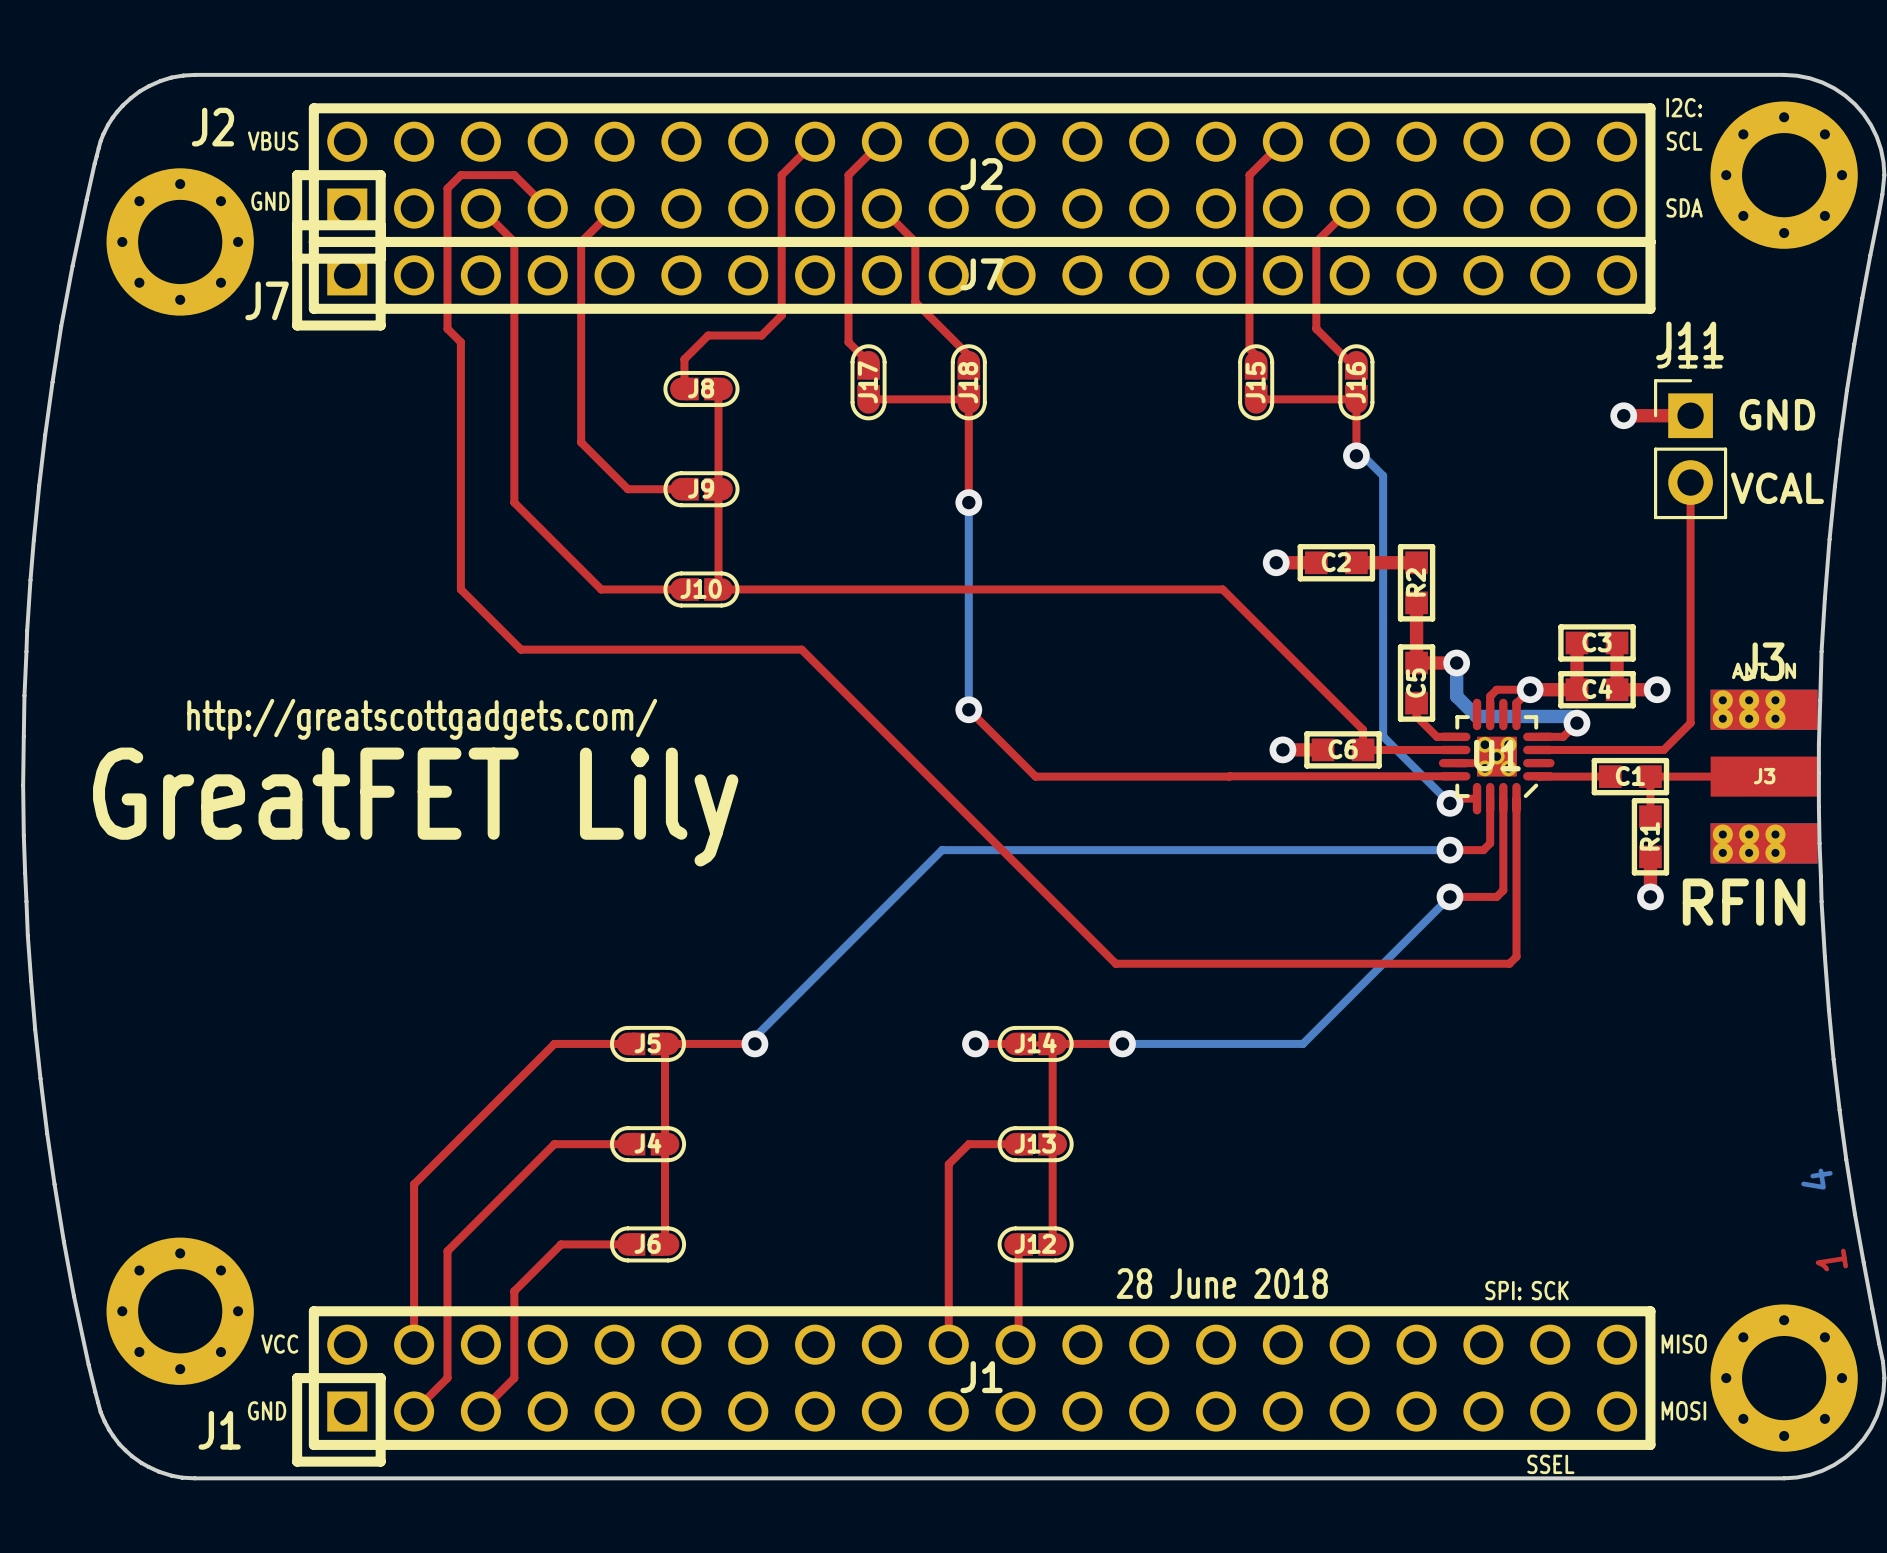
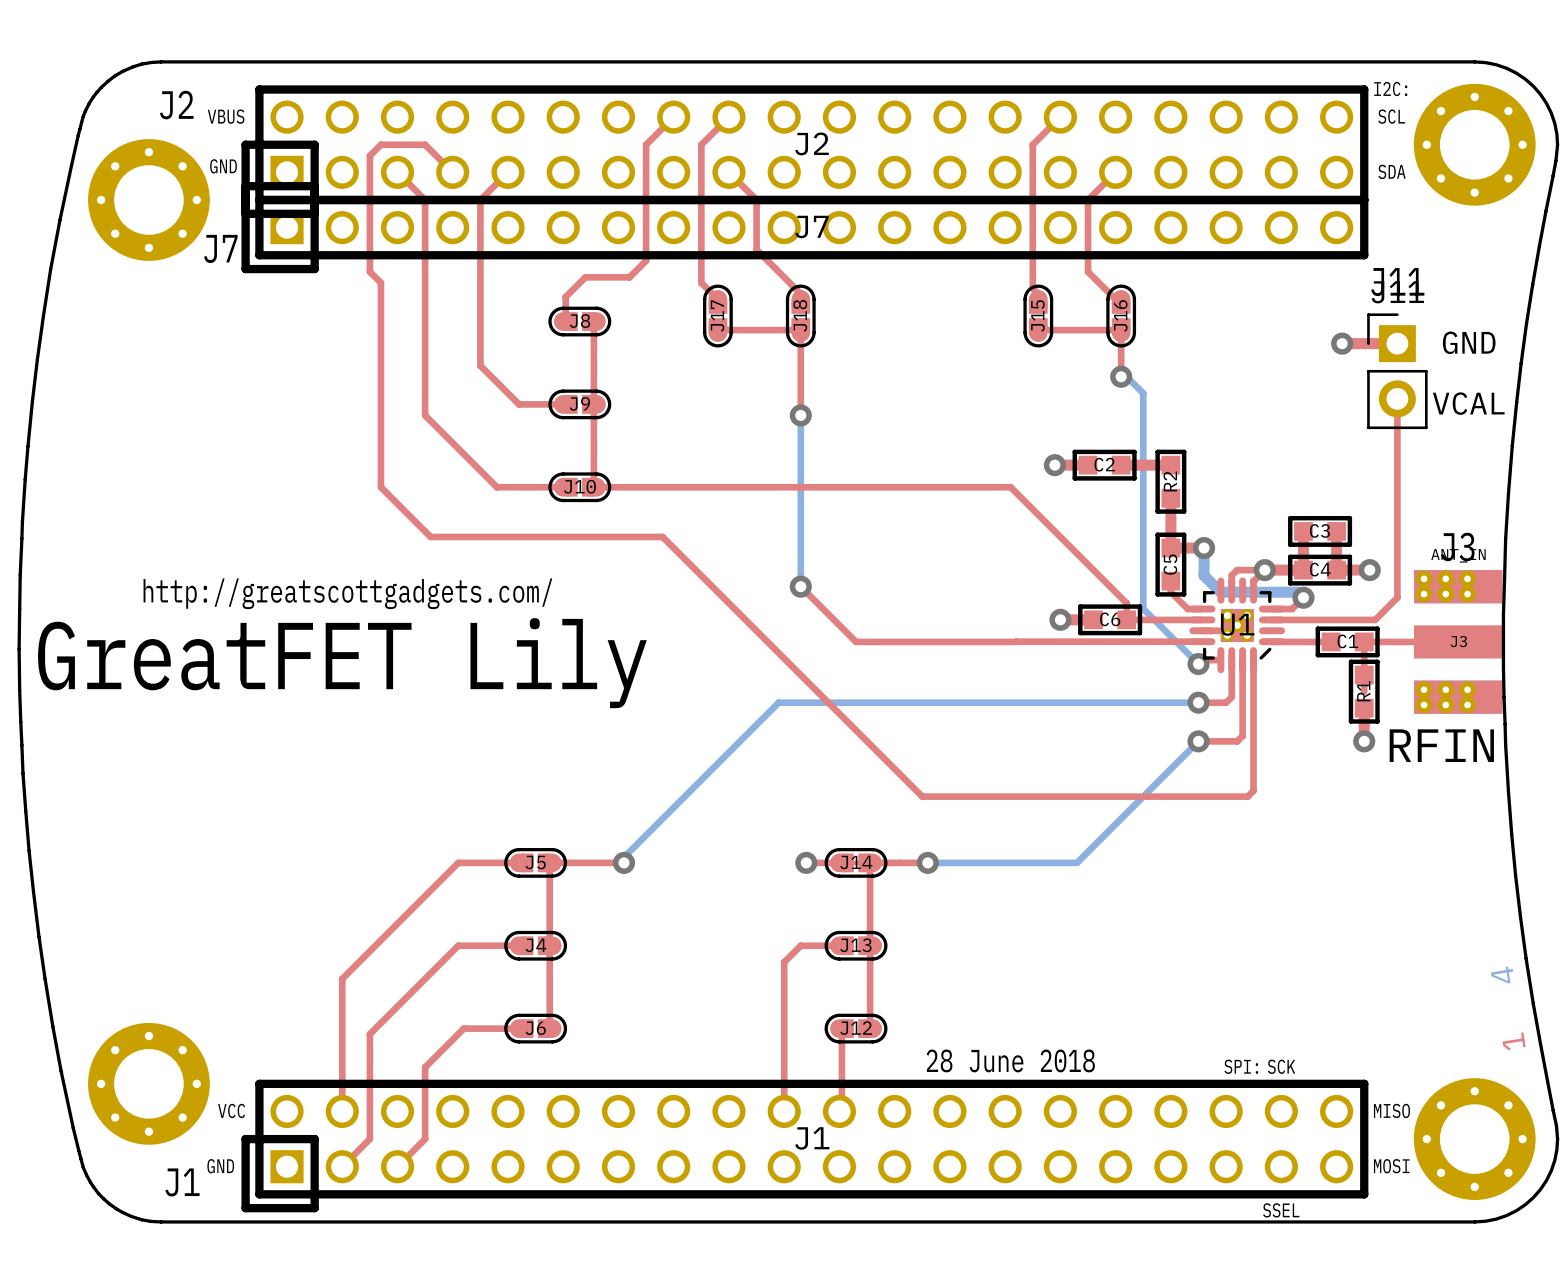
top track: none -> (1364, 675) (1364, 691)

